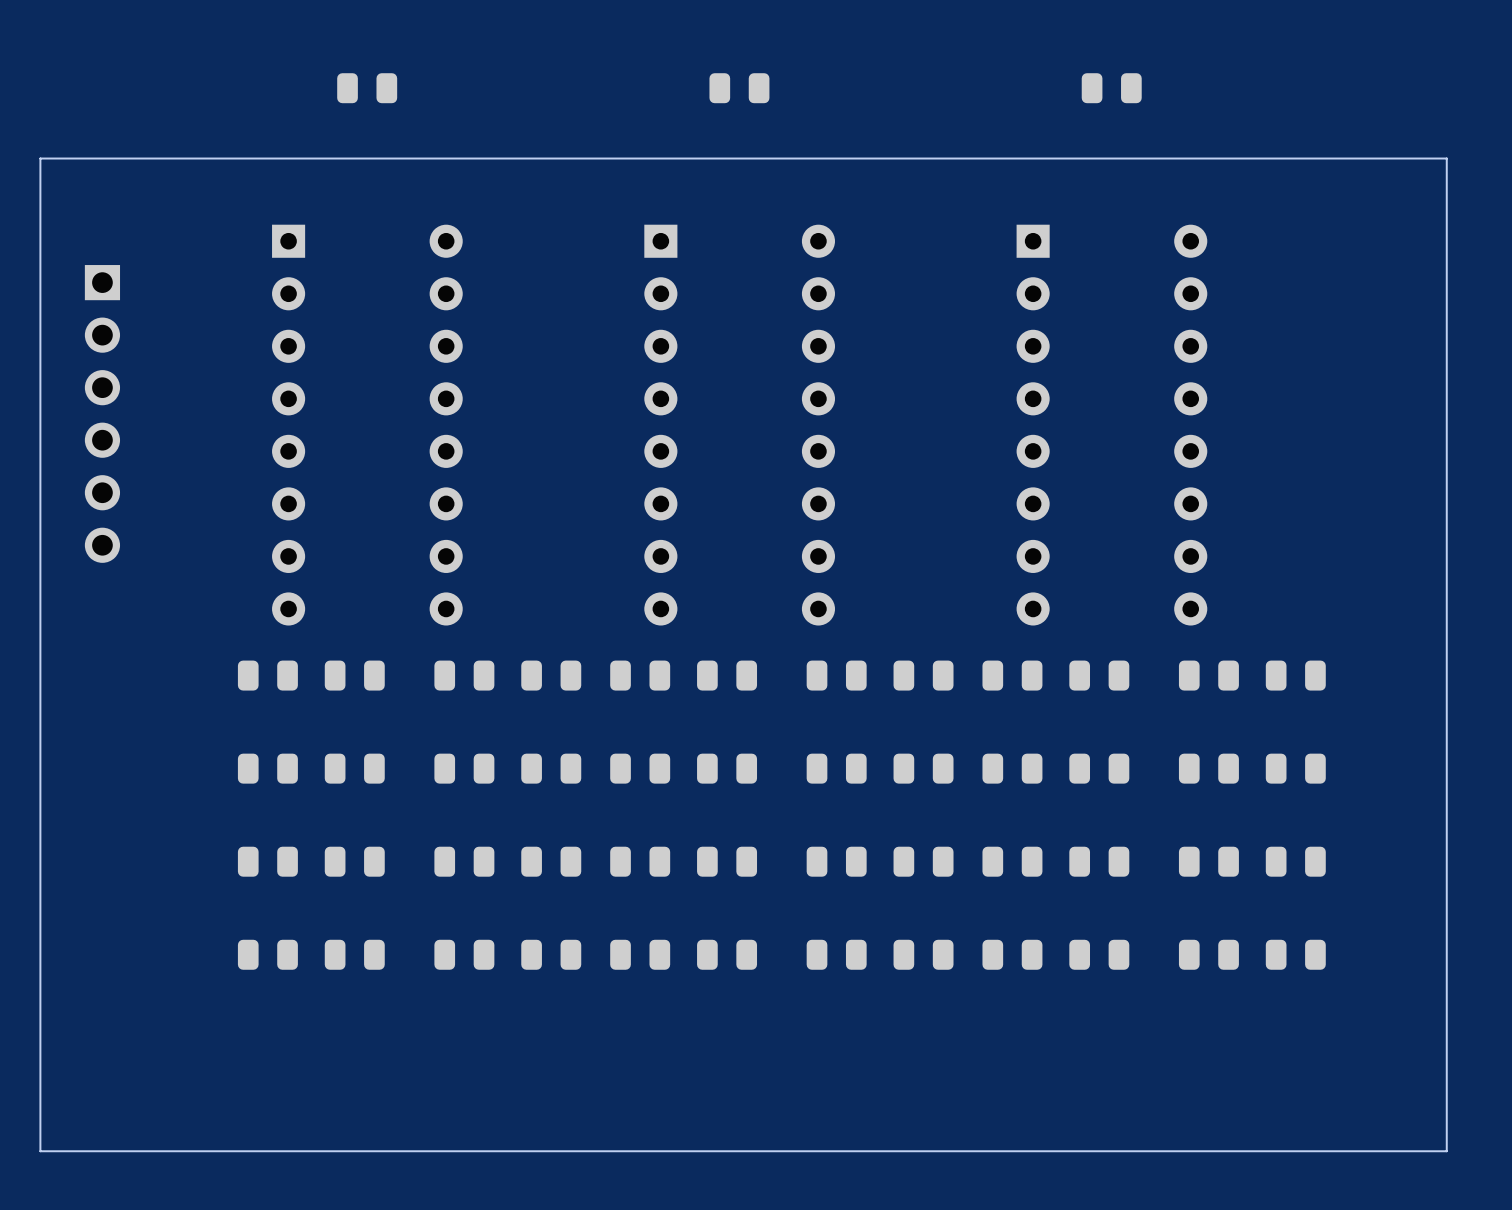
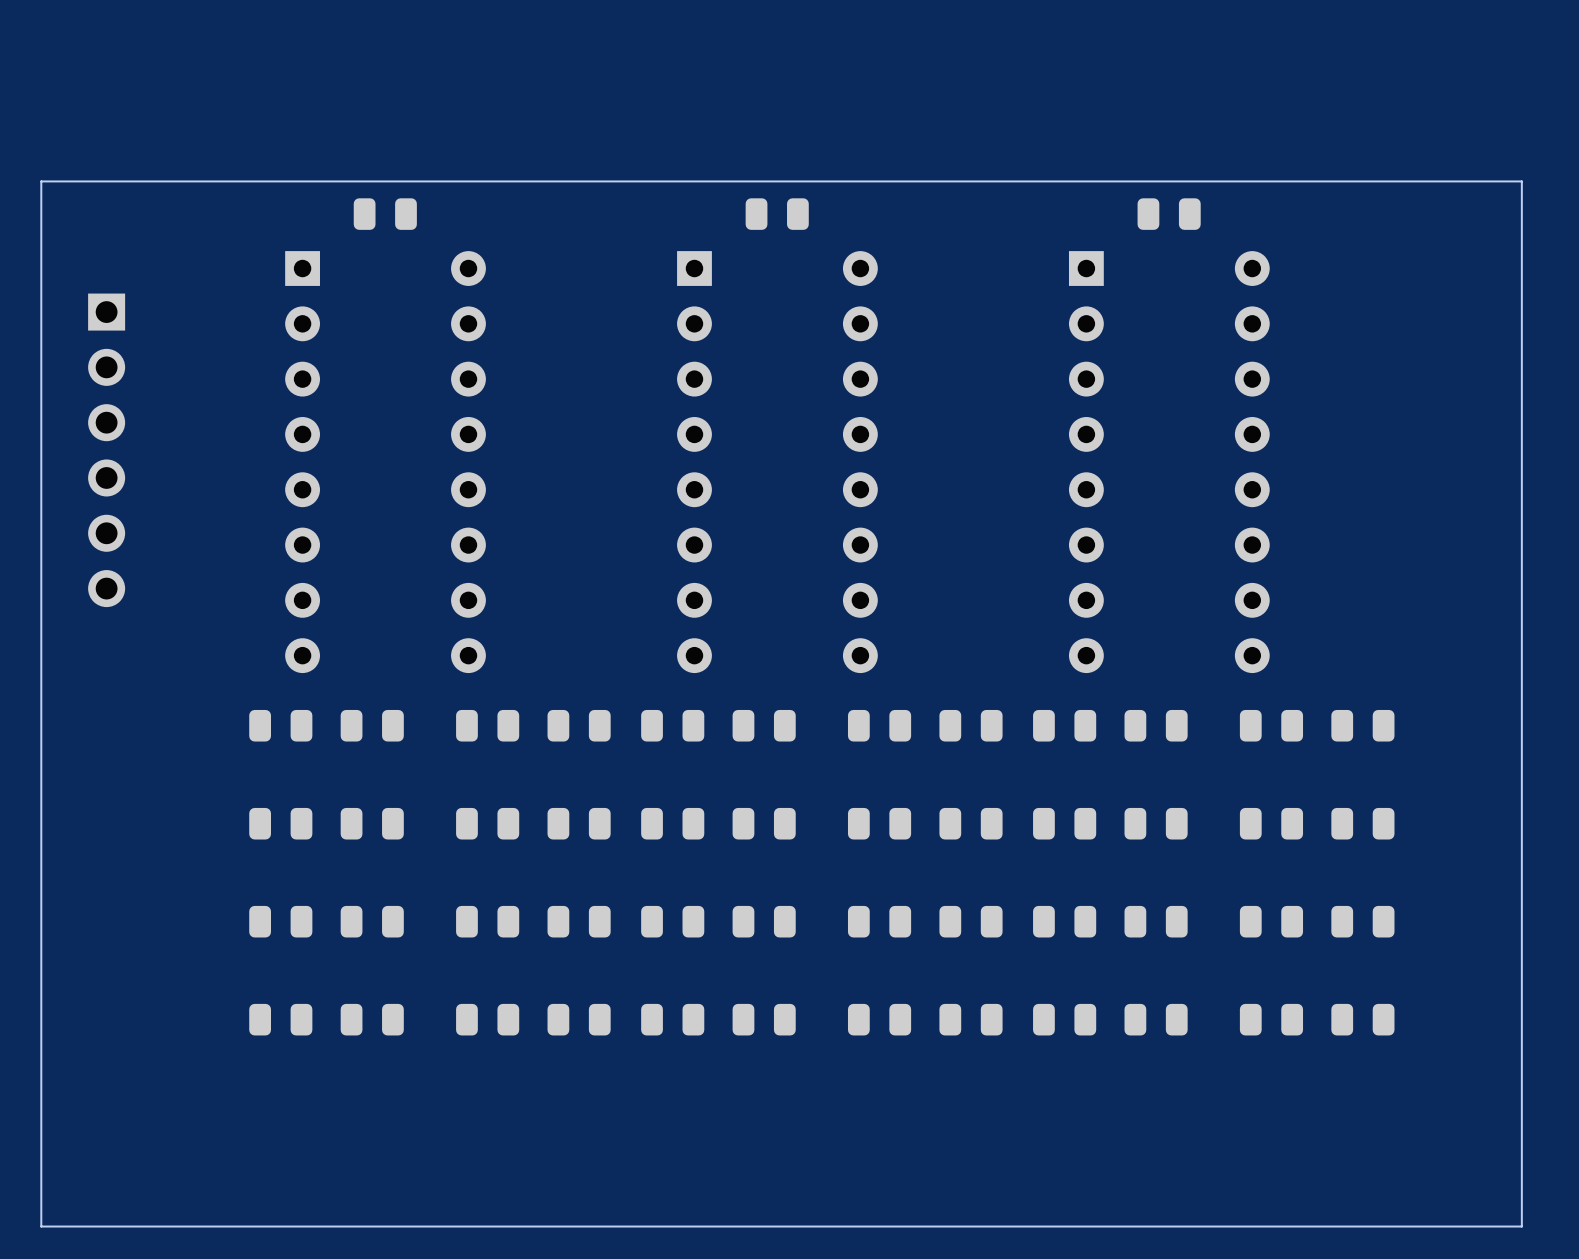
part position: (367, 88) -> (385, 214)
part position: (739, 88) -> (777, 214)
part position: (1111, 88) -> (1169, 214)

